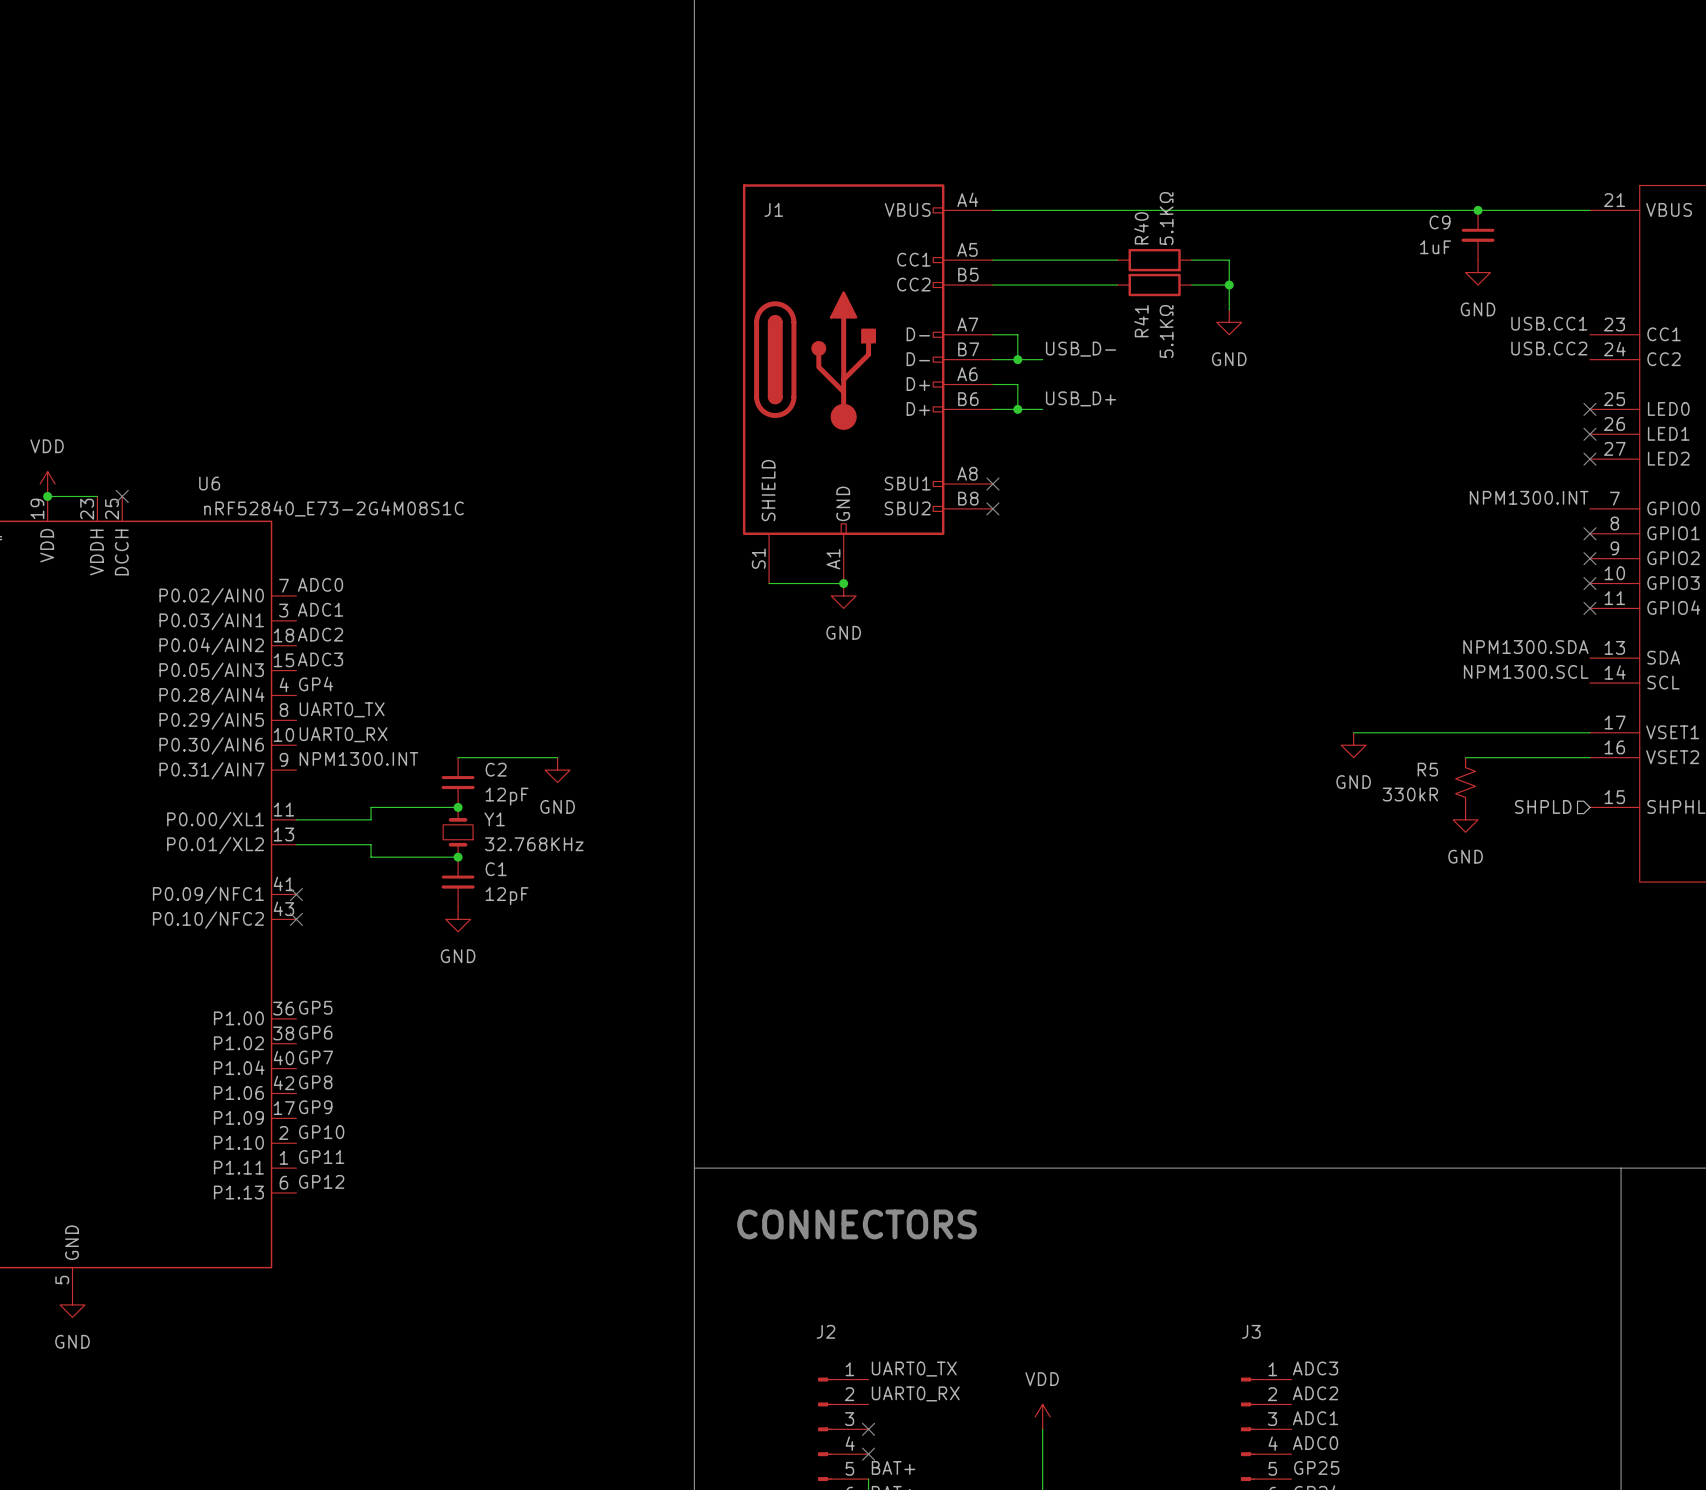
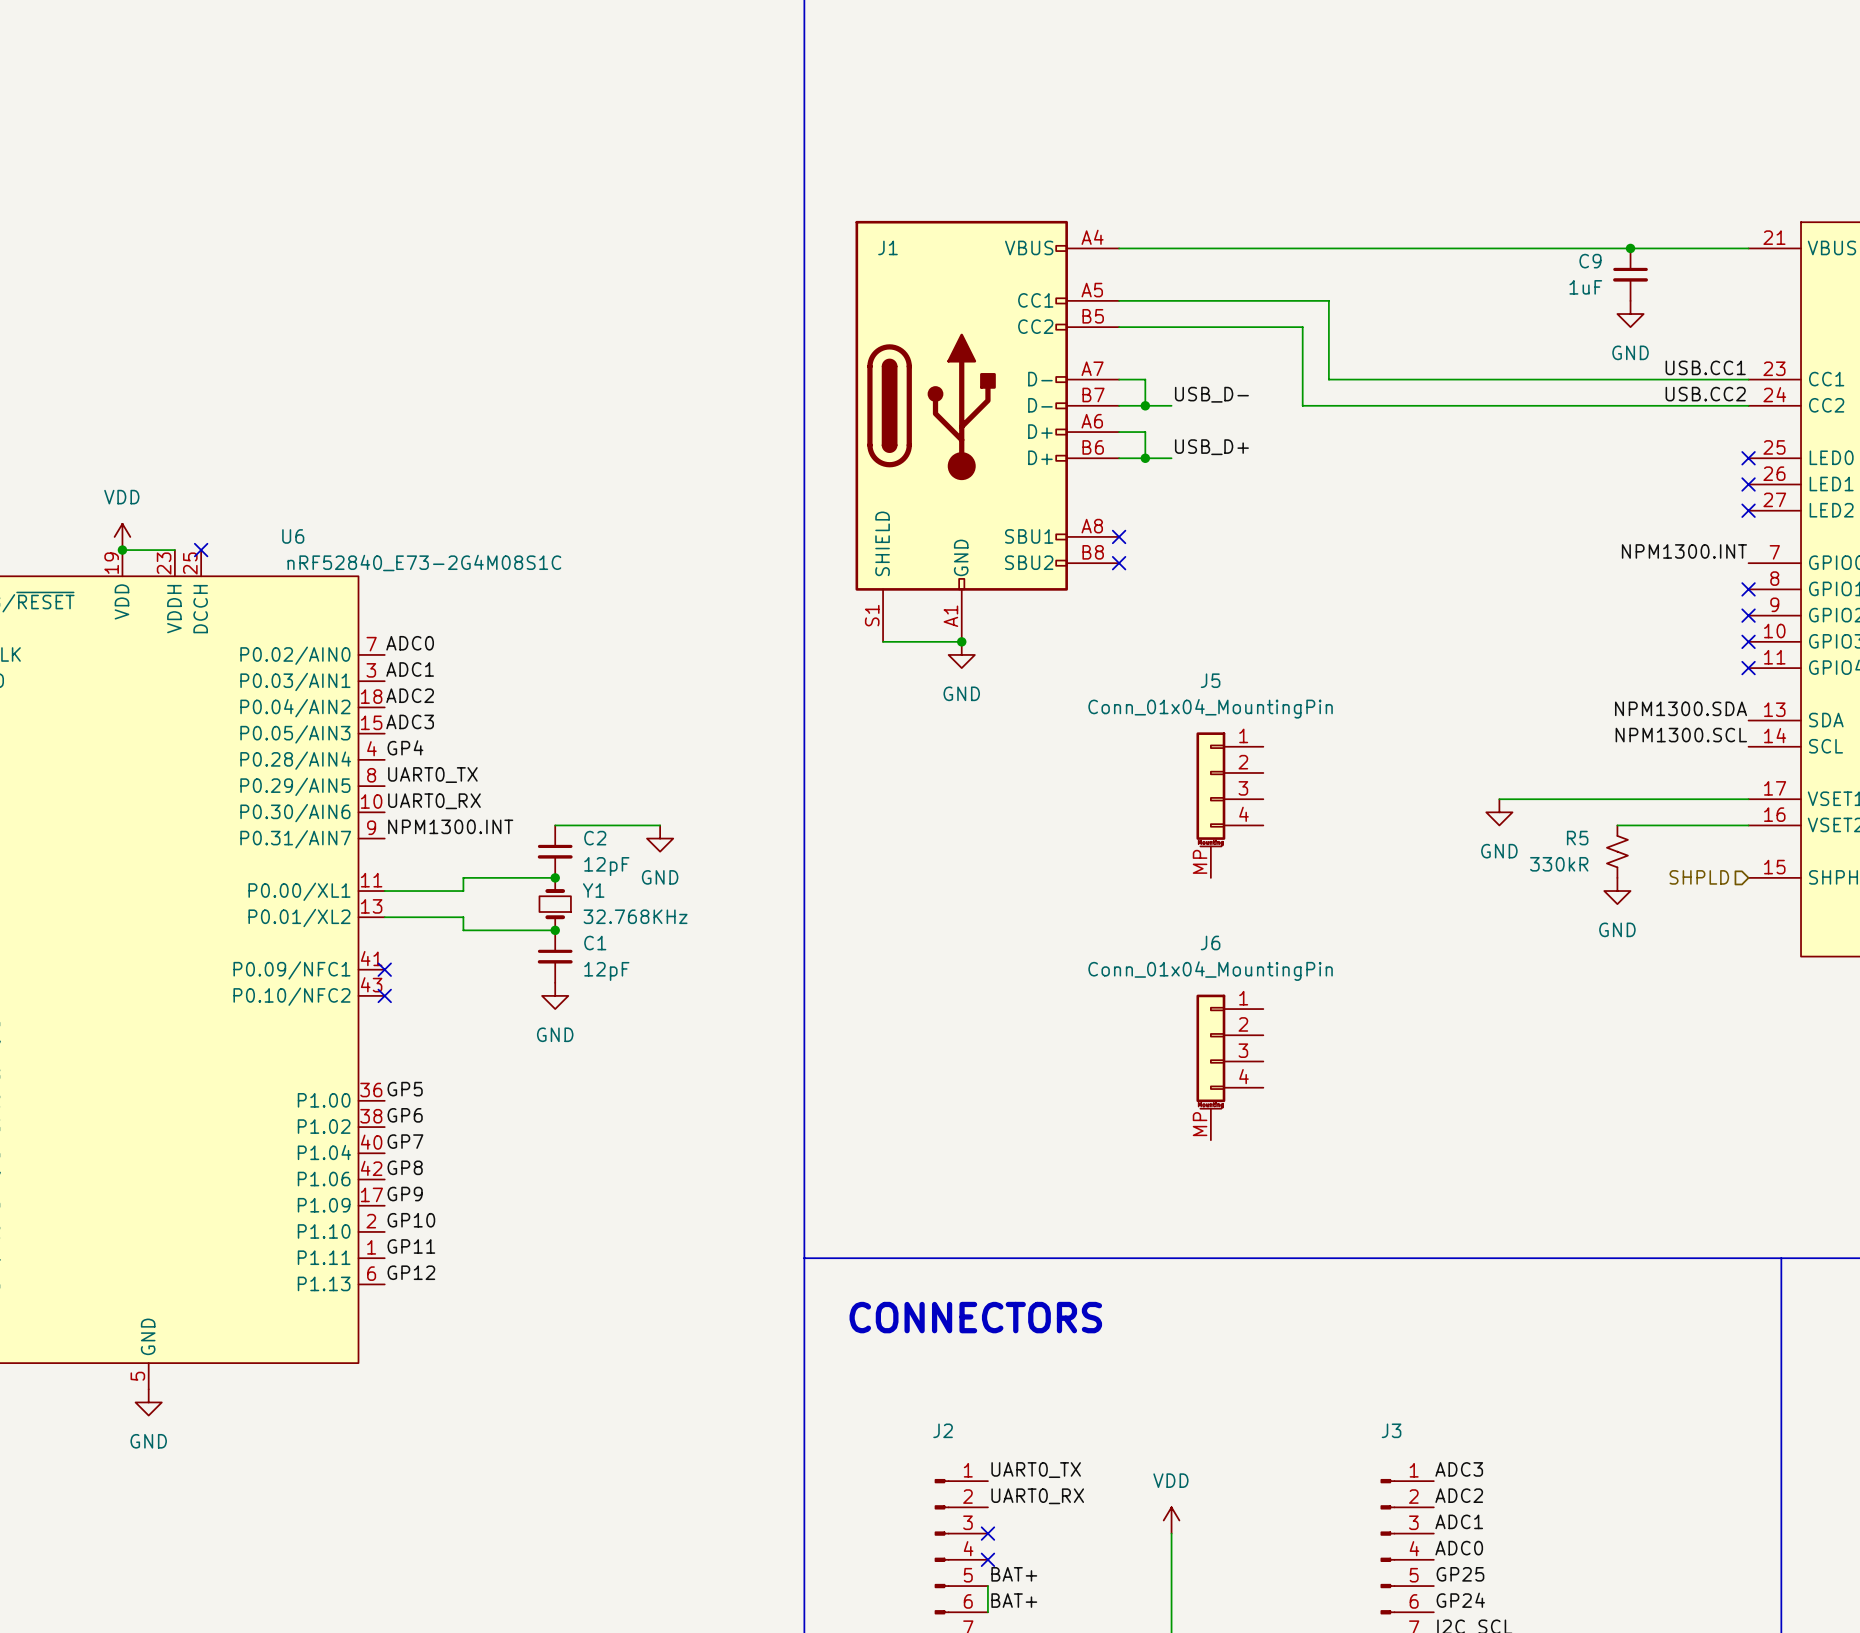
wire: none -> (1250, 300) (1328, 300) (1328, 379) (1748, 379)
R40: 5.1KΩ (1154, 260) -> none
wire: (1191, 260) (1229, 260) (1229, 309) -> none
wire: none -> (1250, 327) (1302, 327) (1302, 405) (1748, 405)
R41: 5.1KΩ (1154, 285) -> none
wire: (1191, 285) (1229, 285) -> none
junction: (1229, 285) -> none
power symbol: GND (1229, 322) -> none
J5: none -> Conn_01x04_MountingPin (1229, 805)
J6: none -> Conn_01x04_MountingPin (1229, 1067)

